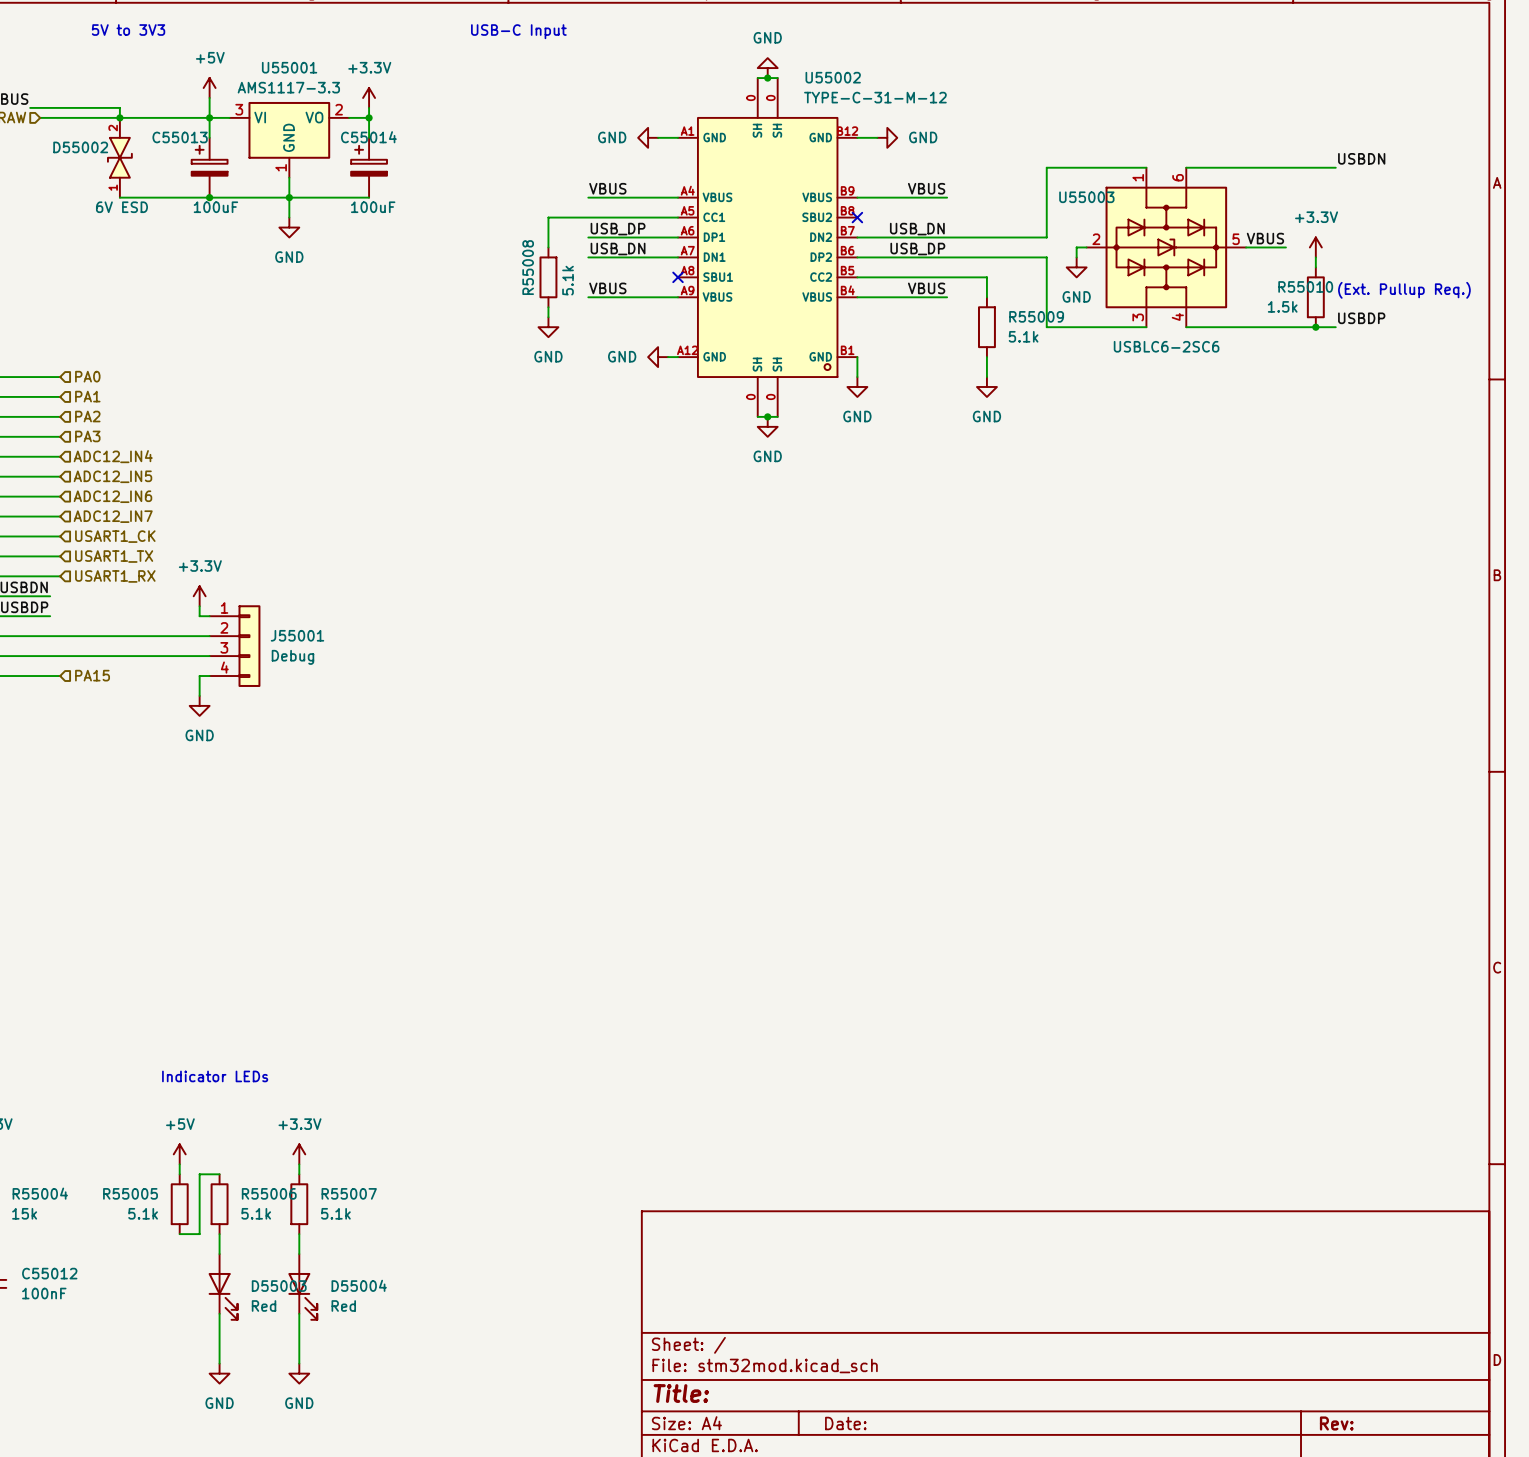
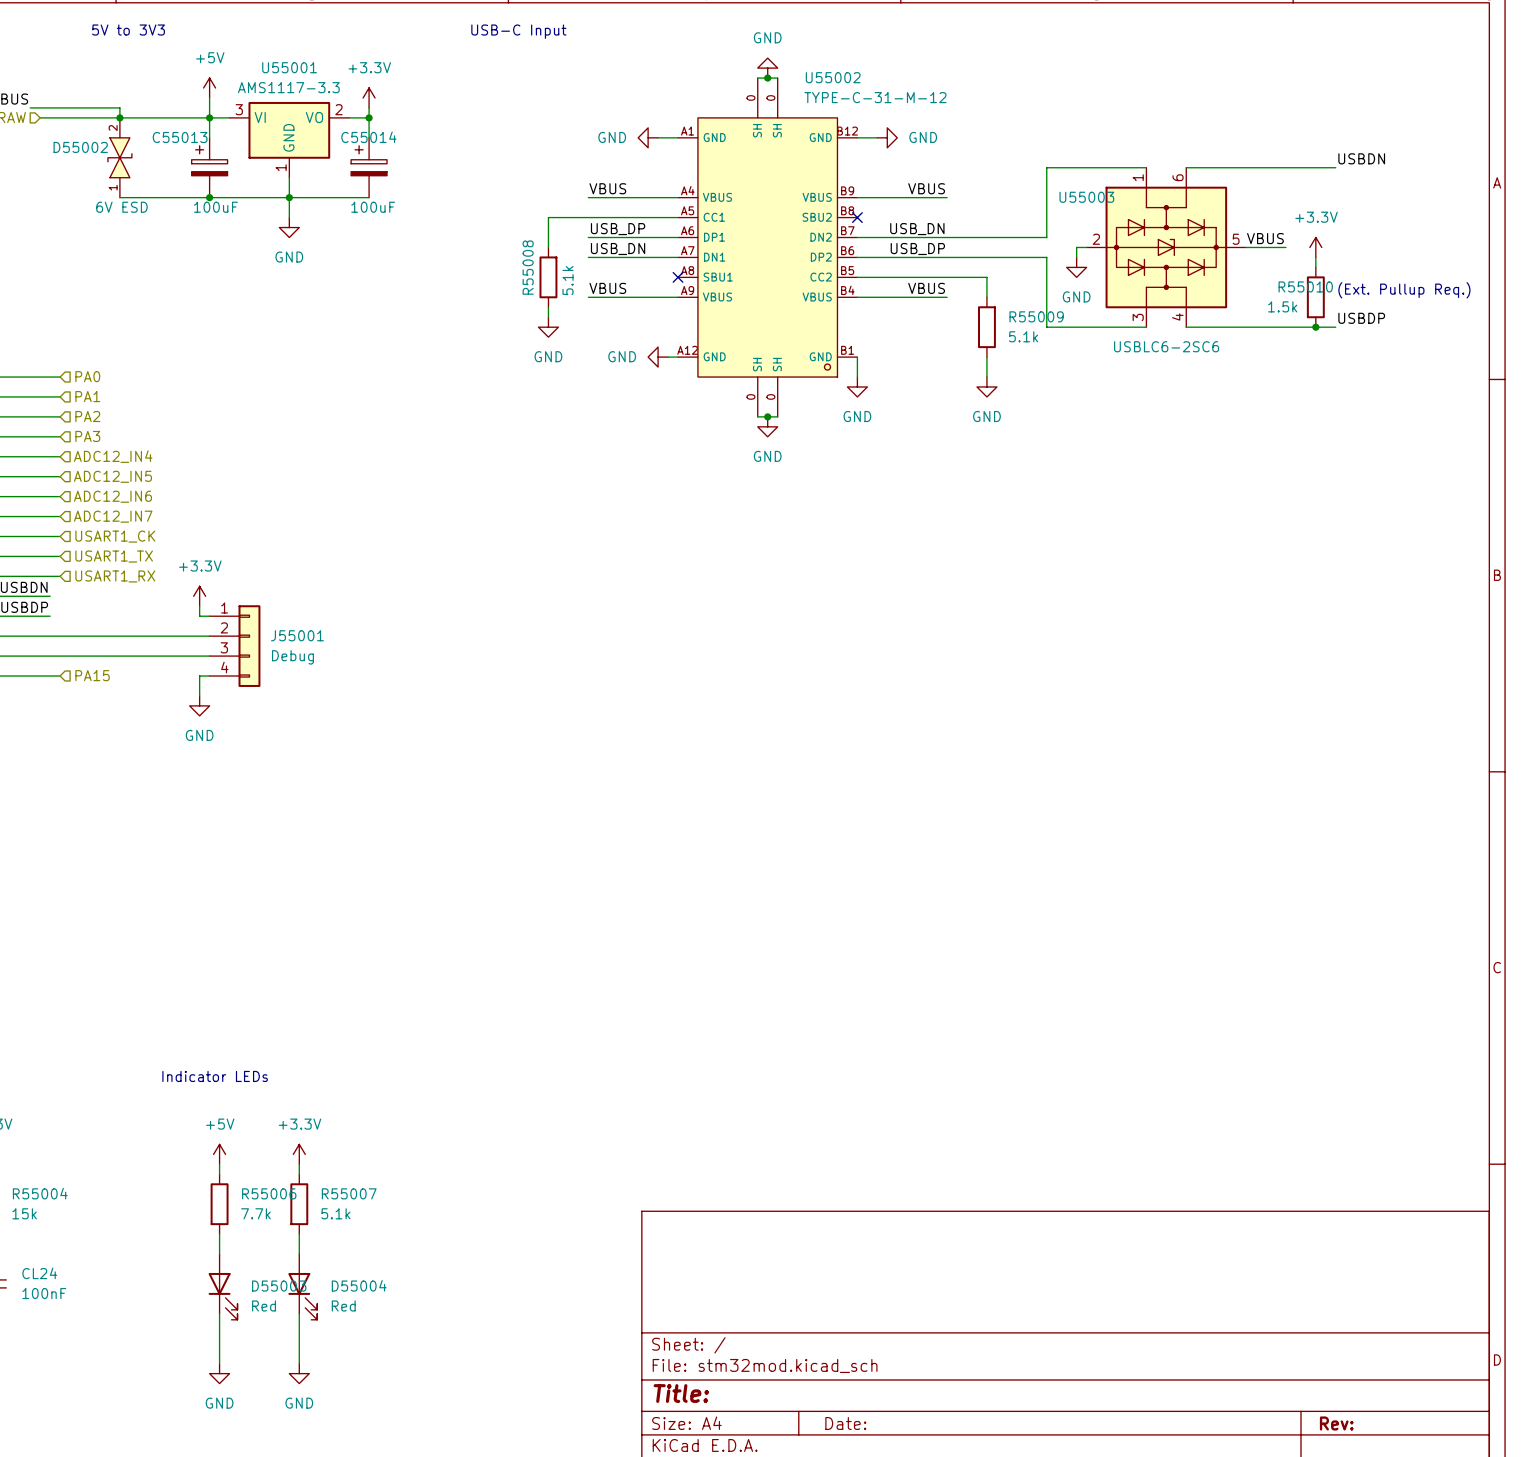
power symbol position: +5V (179, 1154) -> +5V (219, 1154)
wire: (179, 1164) (179, 1174) -> none
wire: (219, 1174) (199, 1174) (199, 1234) (179, 1234) -> (219, 1174) (219, 1164)
R55005: 5.1k (179, 1204) -> none
R55006 value: 5.1k (256, 1213) -> 7.7k (255, 1213)
C55012 name: C55012 (49, 1273) -> CL24 (39, 1273)

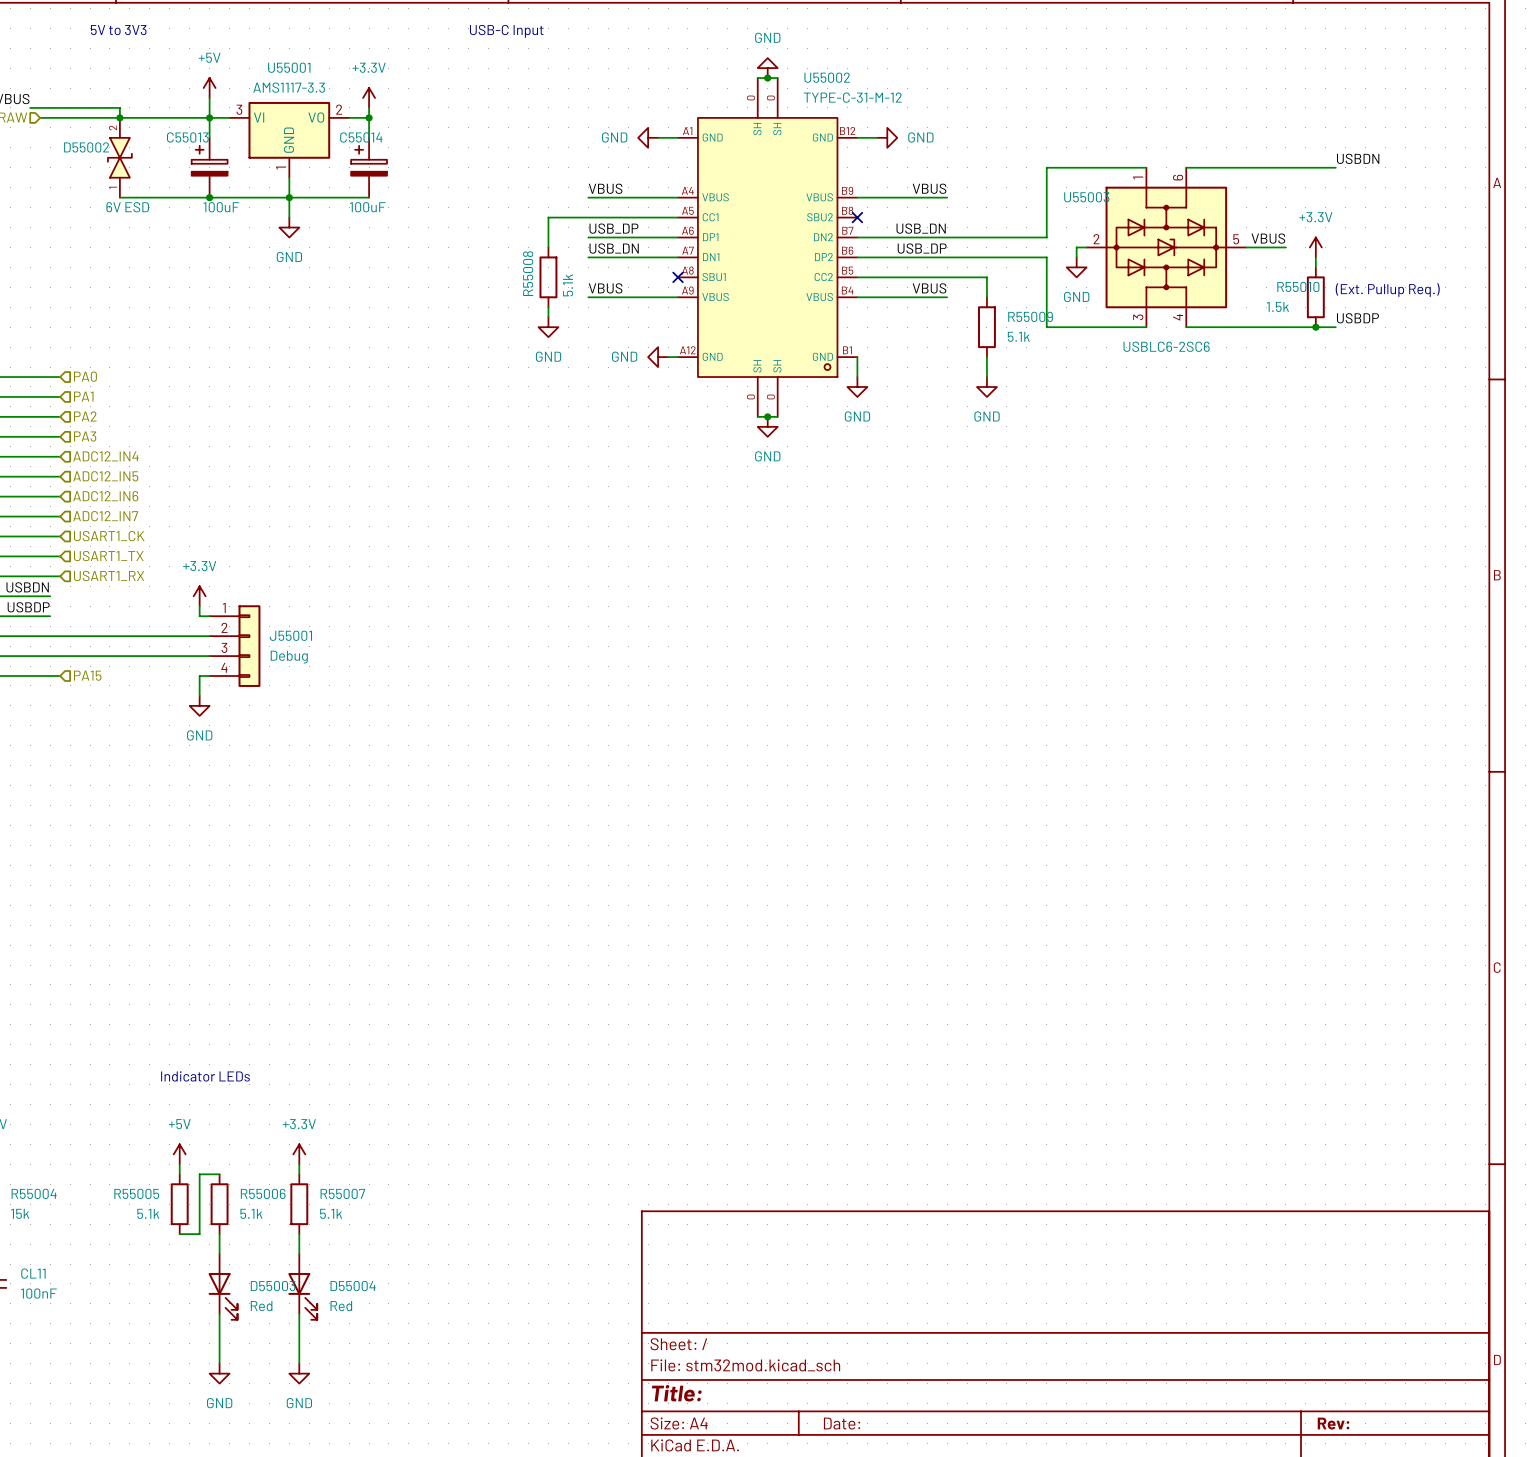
power symbol position: +5V (219, 1154) -> +5V (179, 1154)
wire: none -> (179, 1164) (179, 1174)
wire: (219, 1164) (219, 1174) -> (179, 1234) (199, 1234) (199, 1174) (219, 1174)
R55005: none -> 5.1k (179, 1204)
R55006 value: 7.7k (255, 1213) -> 5.1k (251, 1213)
CL24 name: CL24 (39, 1273) -> CL11 (33, 1273)

